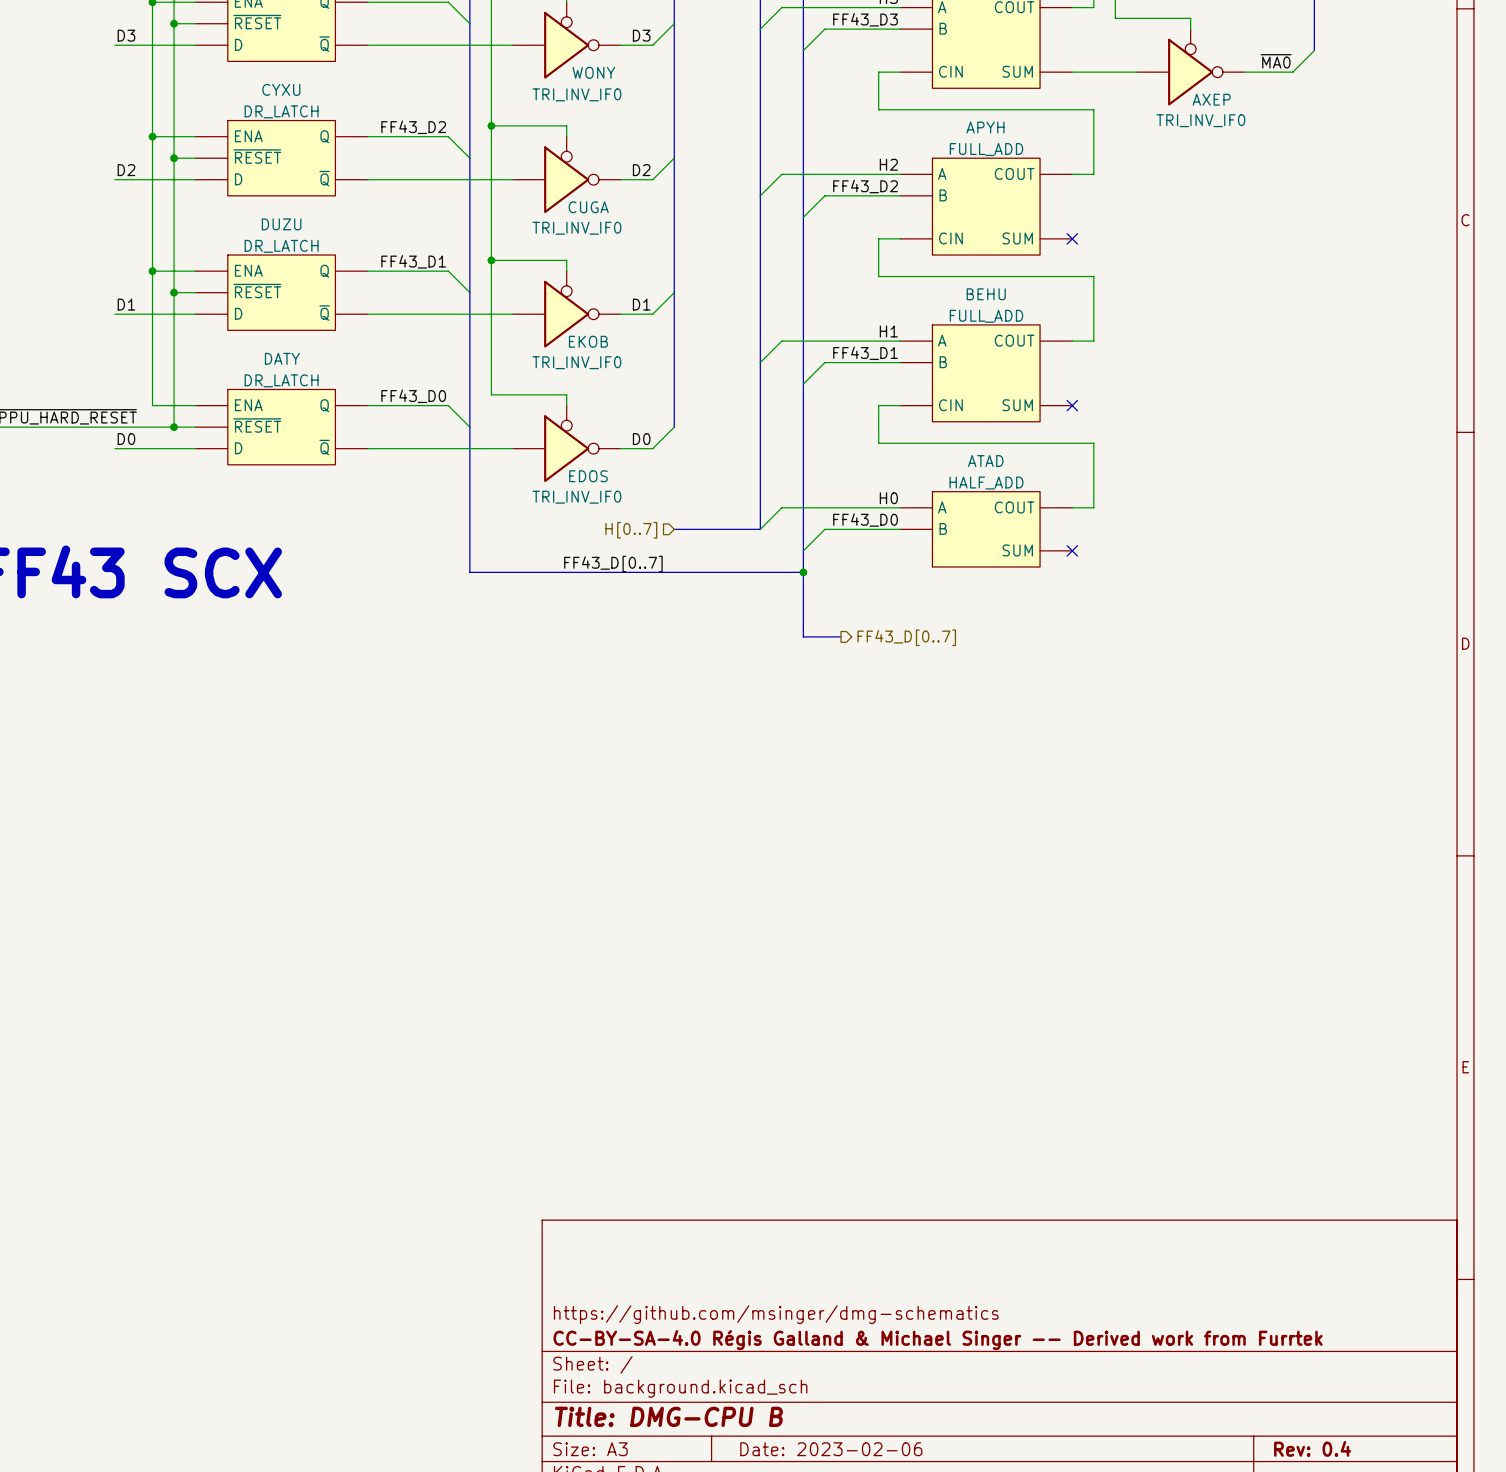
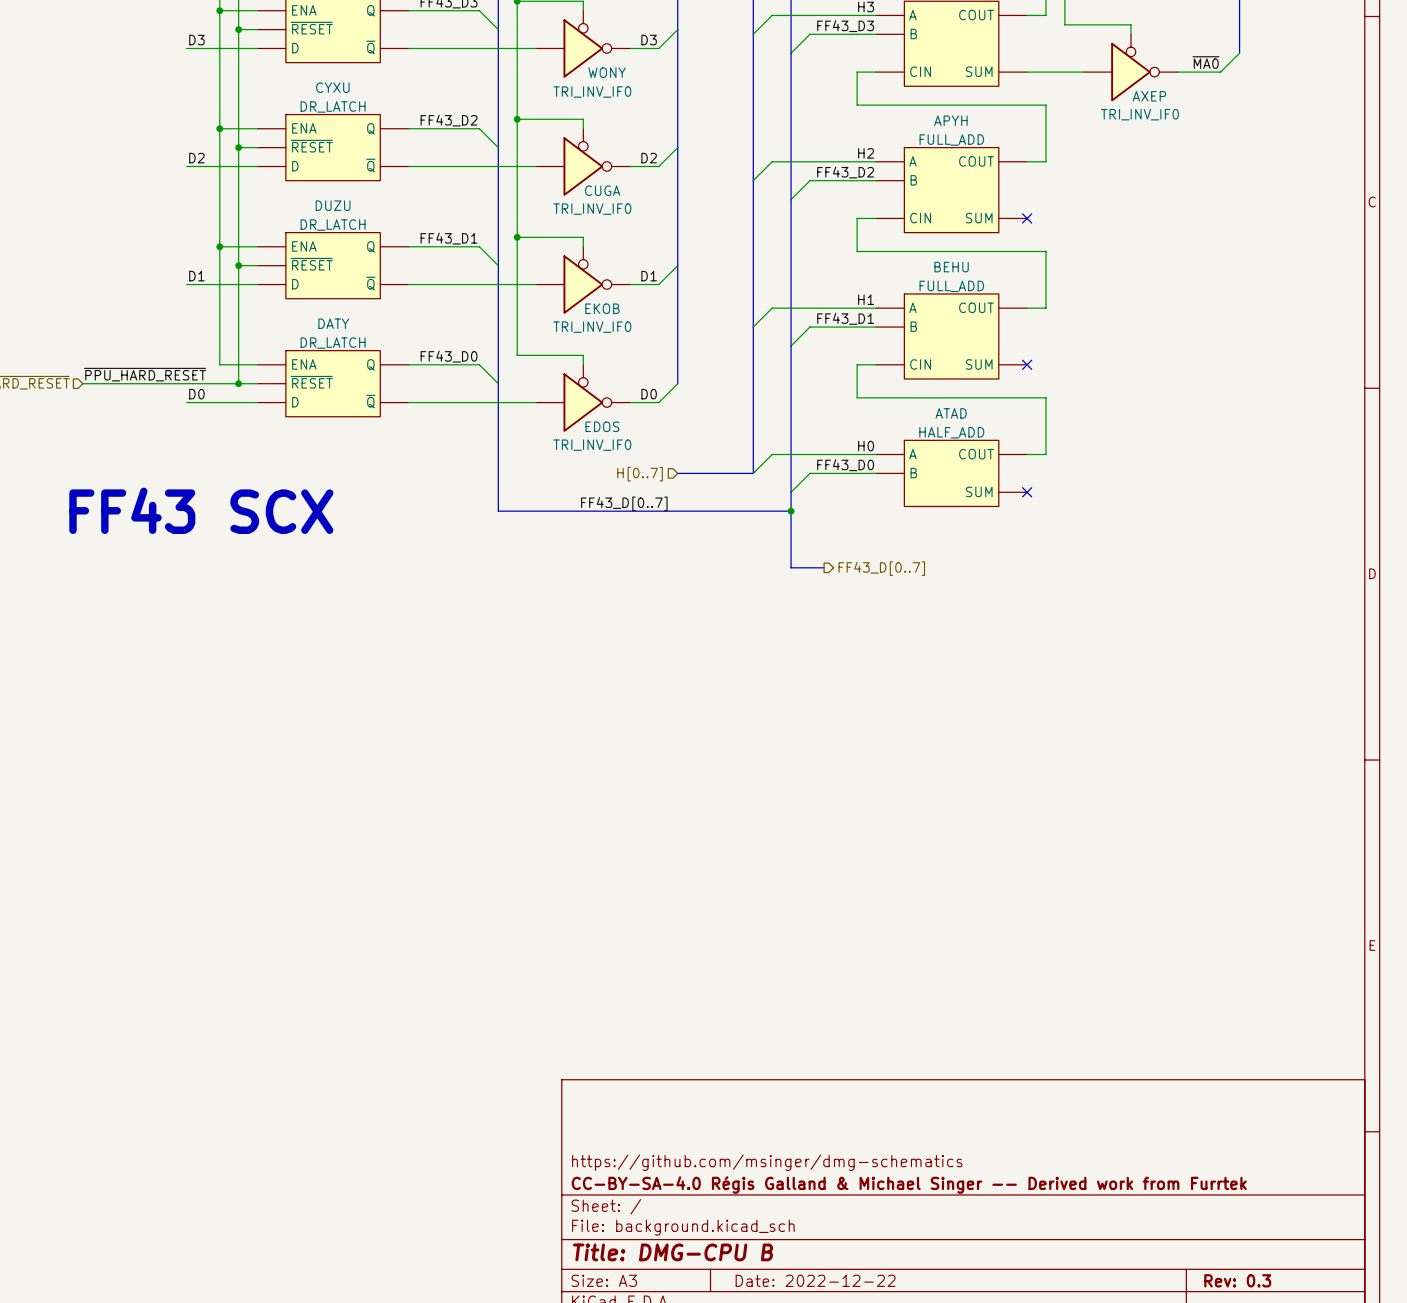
title block: Rev: 0.4 (1312, 1448) -> Rev: 0.3 (1237, 1280)
title block: Date: 2023-02-06 (831, 1449) -> Date: 2022-12-22 (815, 1280)

